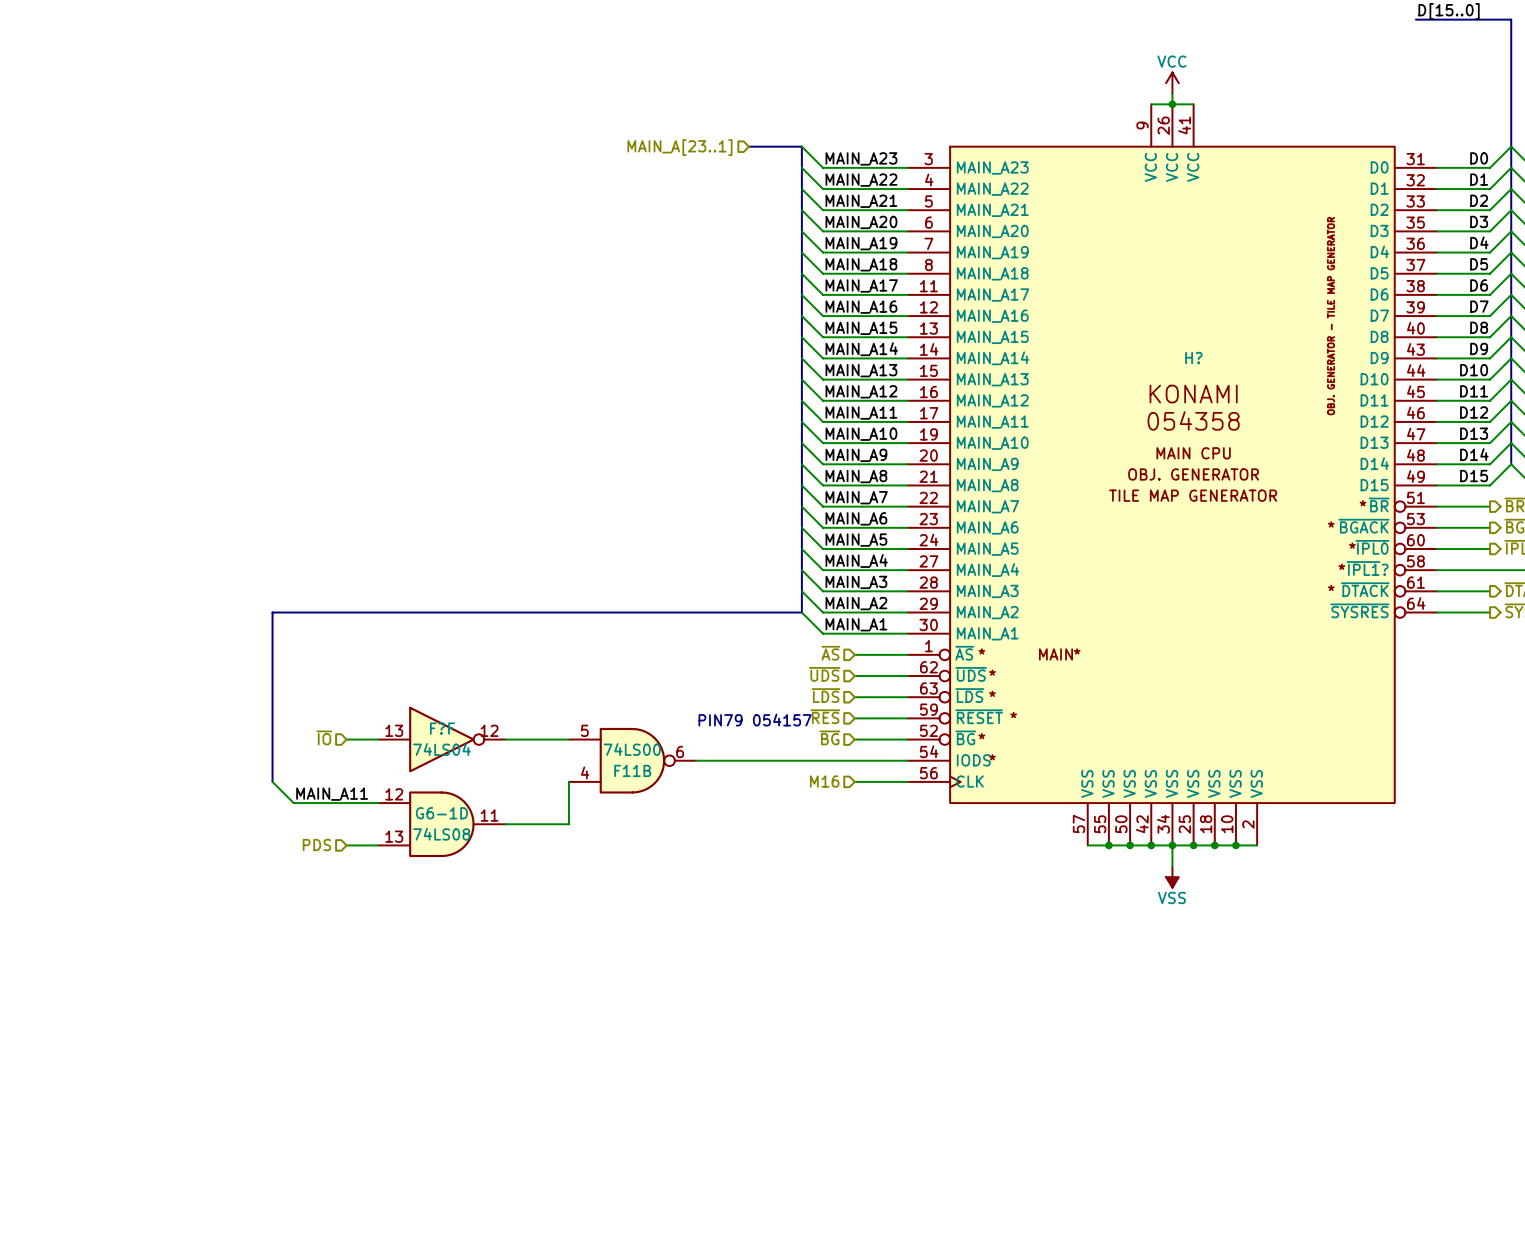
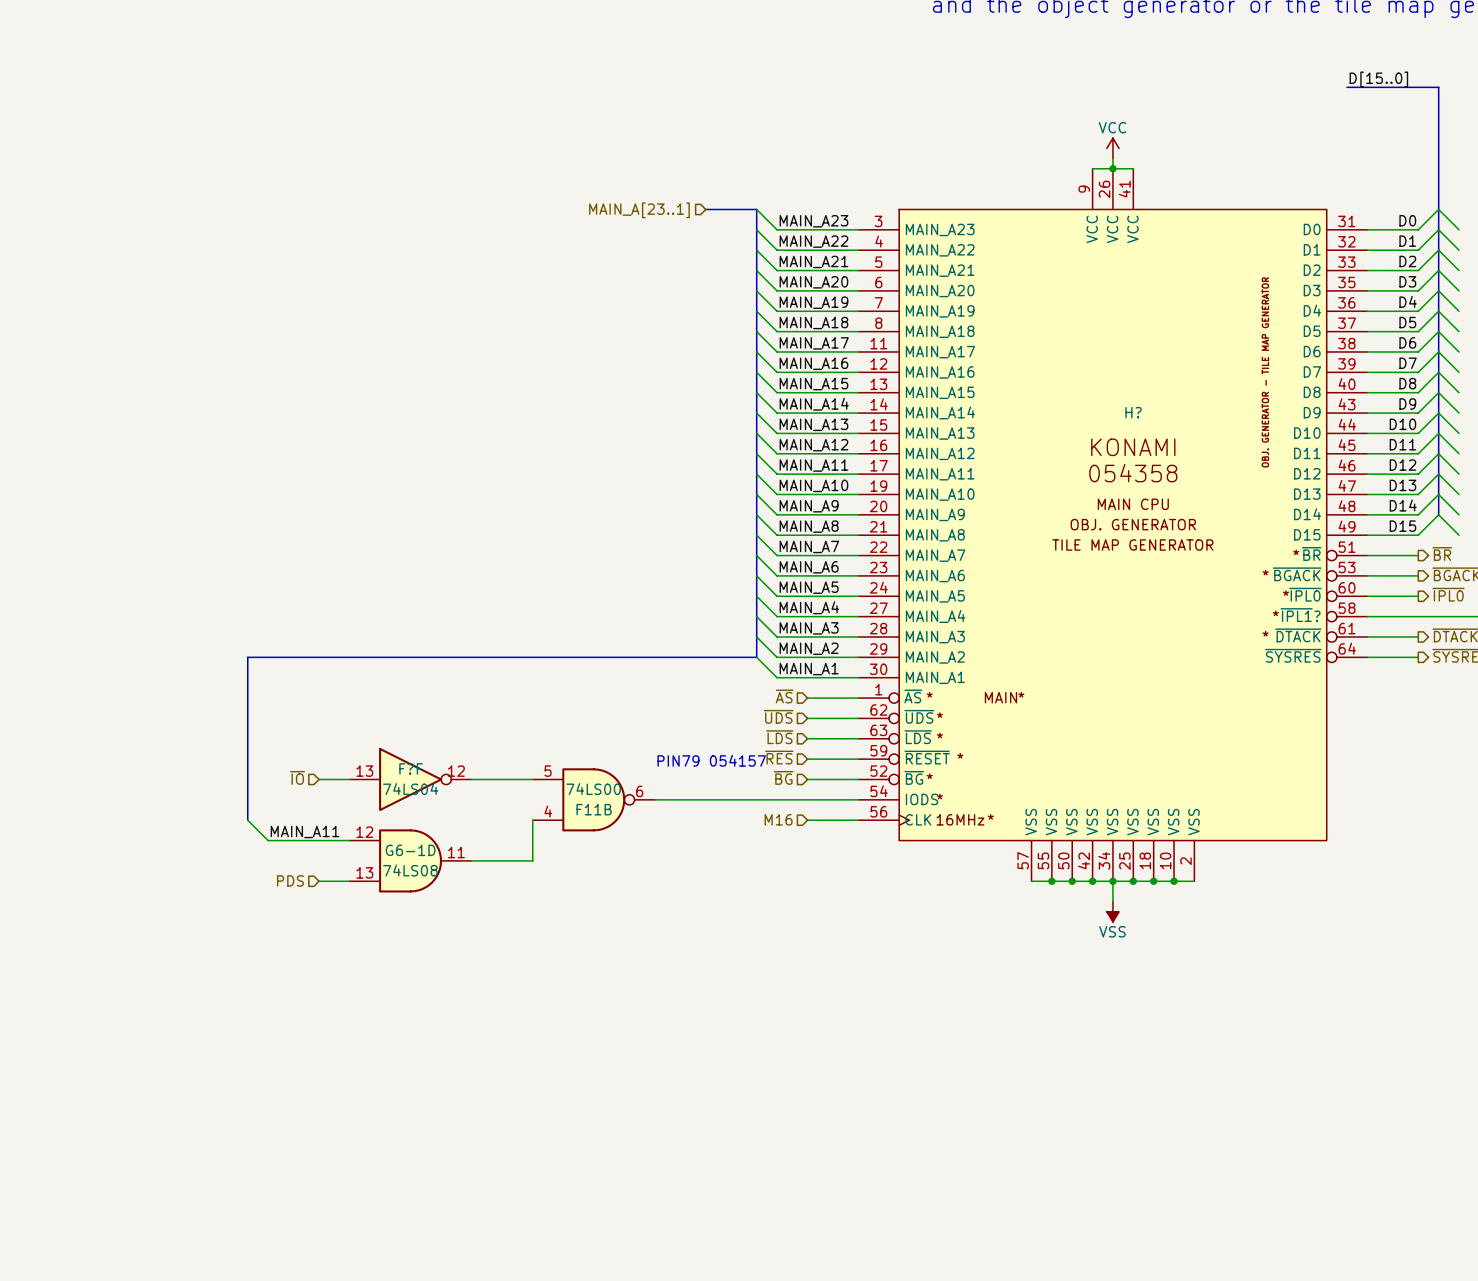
H? text: none -> * (990, 816)
H? text: none -> 16MHz (960, 819)

